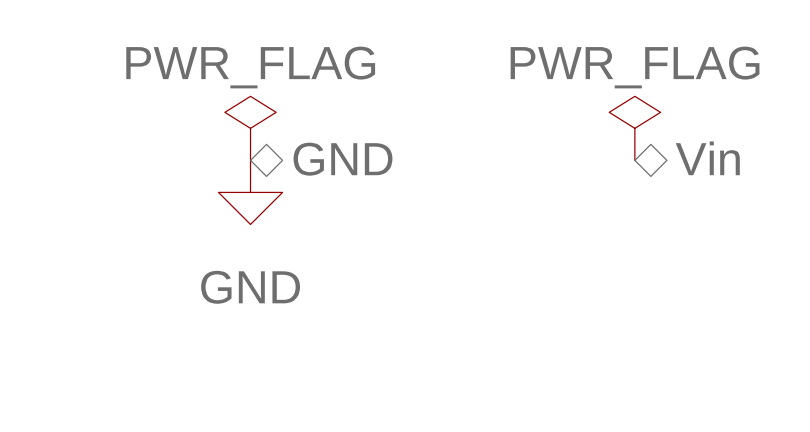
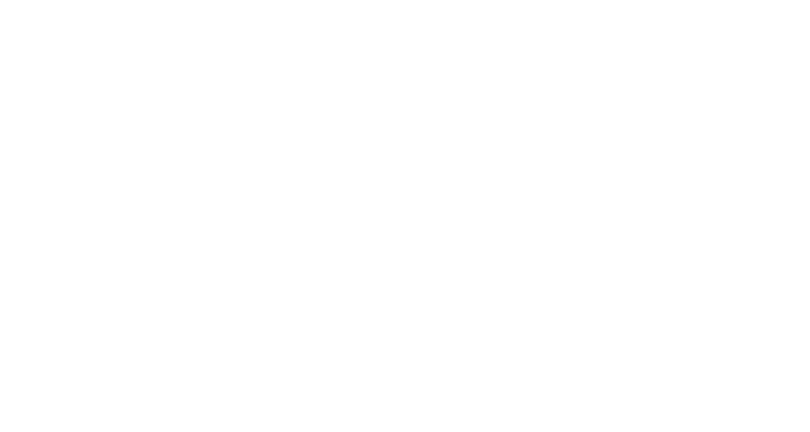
power symbol: PWR_FLAG (250, 128) -> none
power symbol: PWR_FLAG (634, 128) -> none
hierarchical label: Vin (707, 158) -> none
hierarchical label: GND (342, 159) -> none
power symbol: GND (250, 192) -> none

